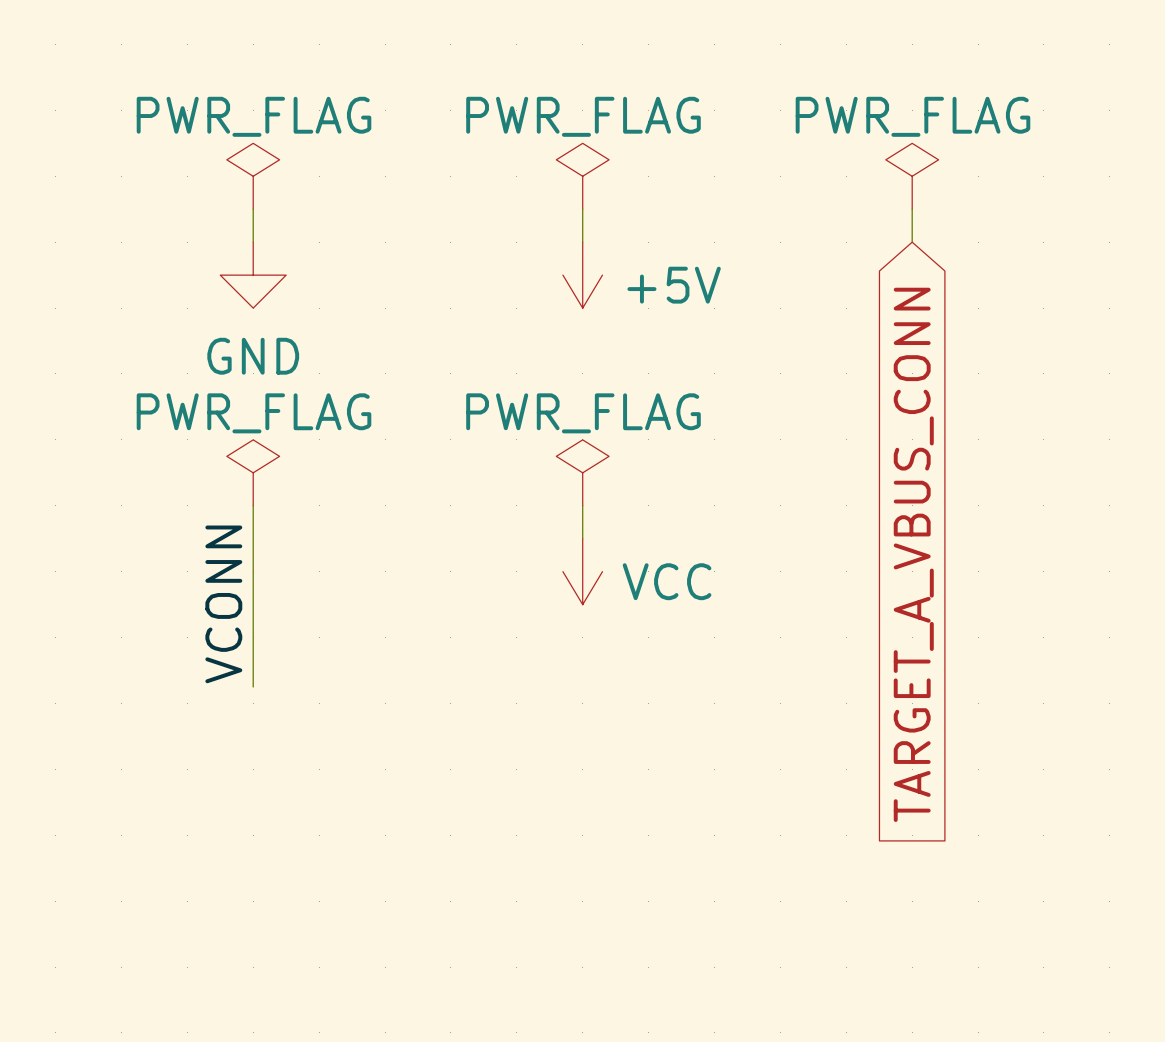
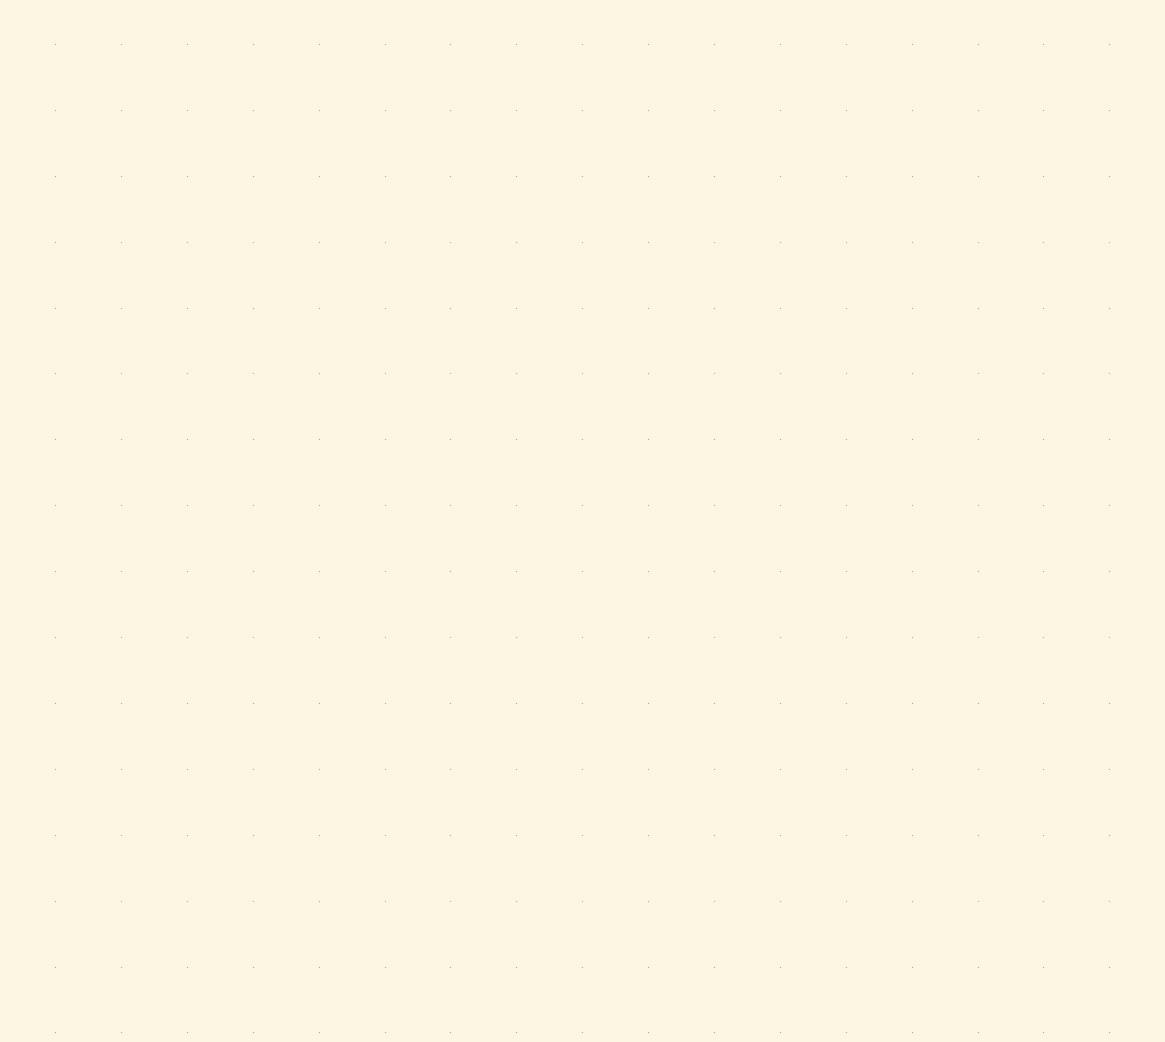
power symbol: PWR_FLAG (253, 176) -> none
power symbol: PWR_FLAG (582, 176) -> none
power symbol: PWR_FLAG (912, 176) -> none
wire: (253, 209) (253, 242) -> none
wire: (582, 209) (582, 242) -> none
wire: (912, 209) (912, 242) -> none
power symbol: GND (253, 275) -> none
power symbol: +5V (582, 275) -> none
power symbol: PWR_FLAG (253, 472) -> none
power symbol: PWR_FLAG (582, 472) -> none
wire: (253, 505) (253, 686) -> none
wire: (582, 505) (582, 538) -> none
global label: TARGET_A_VBUS_CONN (913, 554) -> none
power symbol: VCC (582, 571) -> none
label: VCONN (223, 604) -> none

